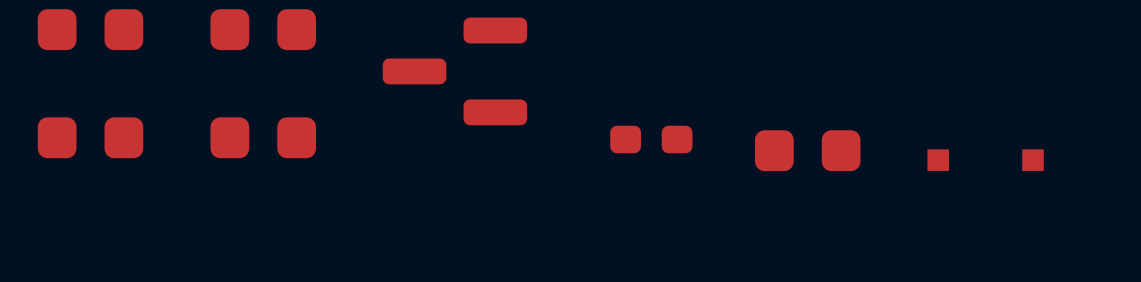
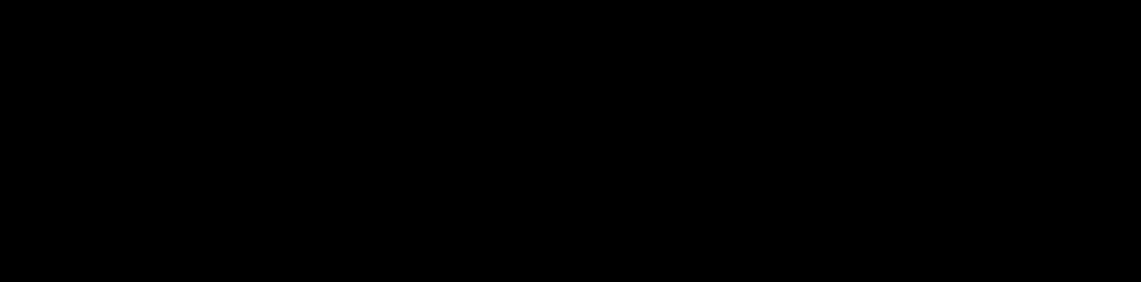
part: (90, 29) -> none
part: (263, 29) -> none
part: (454, 71) -> none
part: (90, 137) -> none
part: (263, 137) -> none
part: (651, 139) -> none
part: (807, 150) -> none
part: (985, 160) -> none

